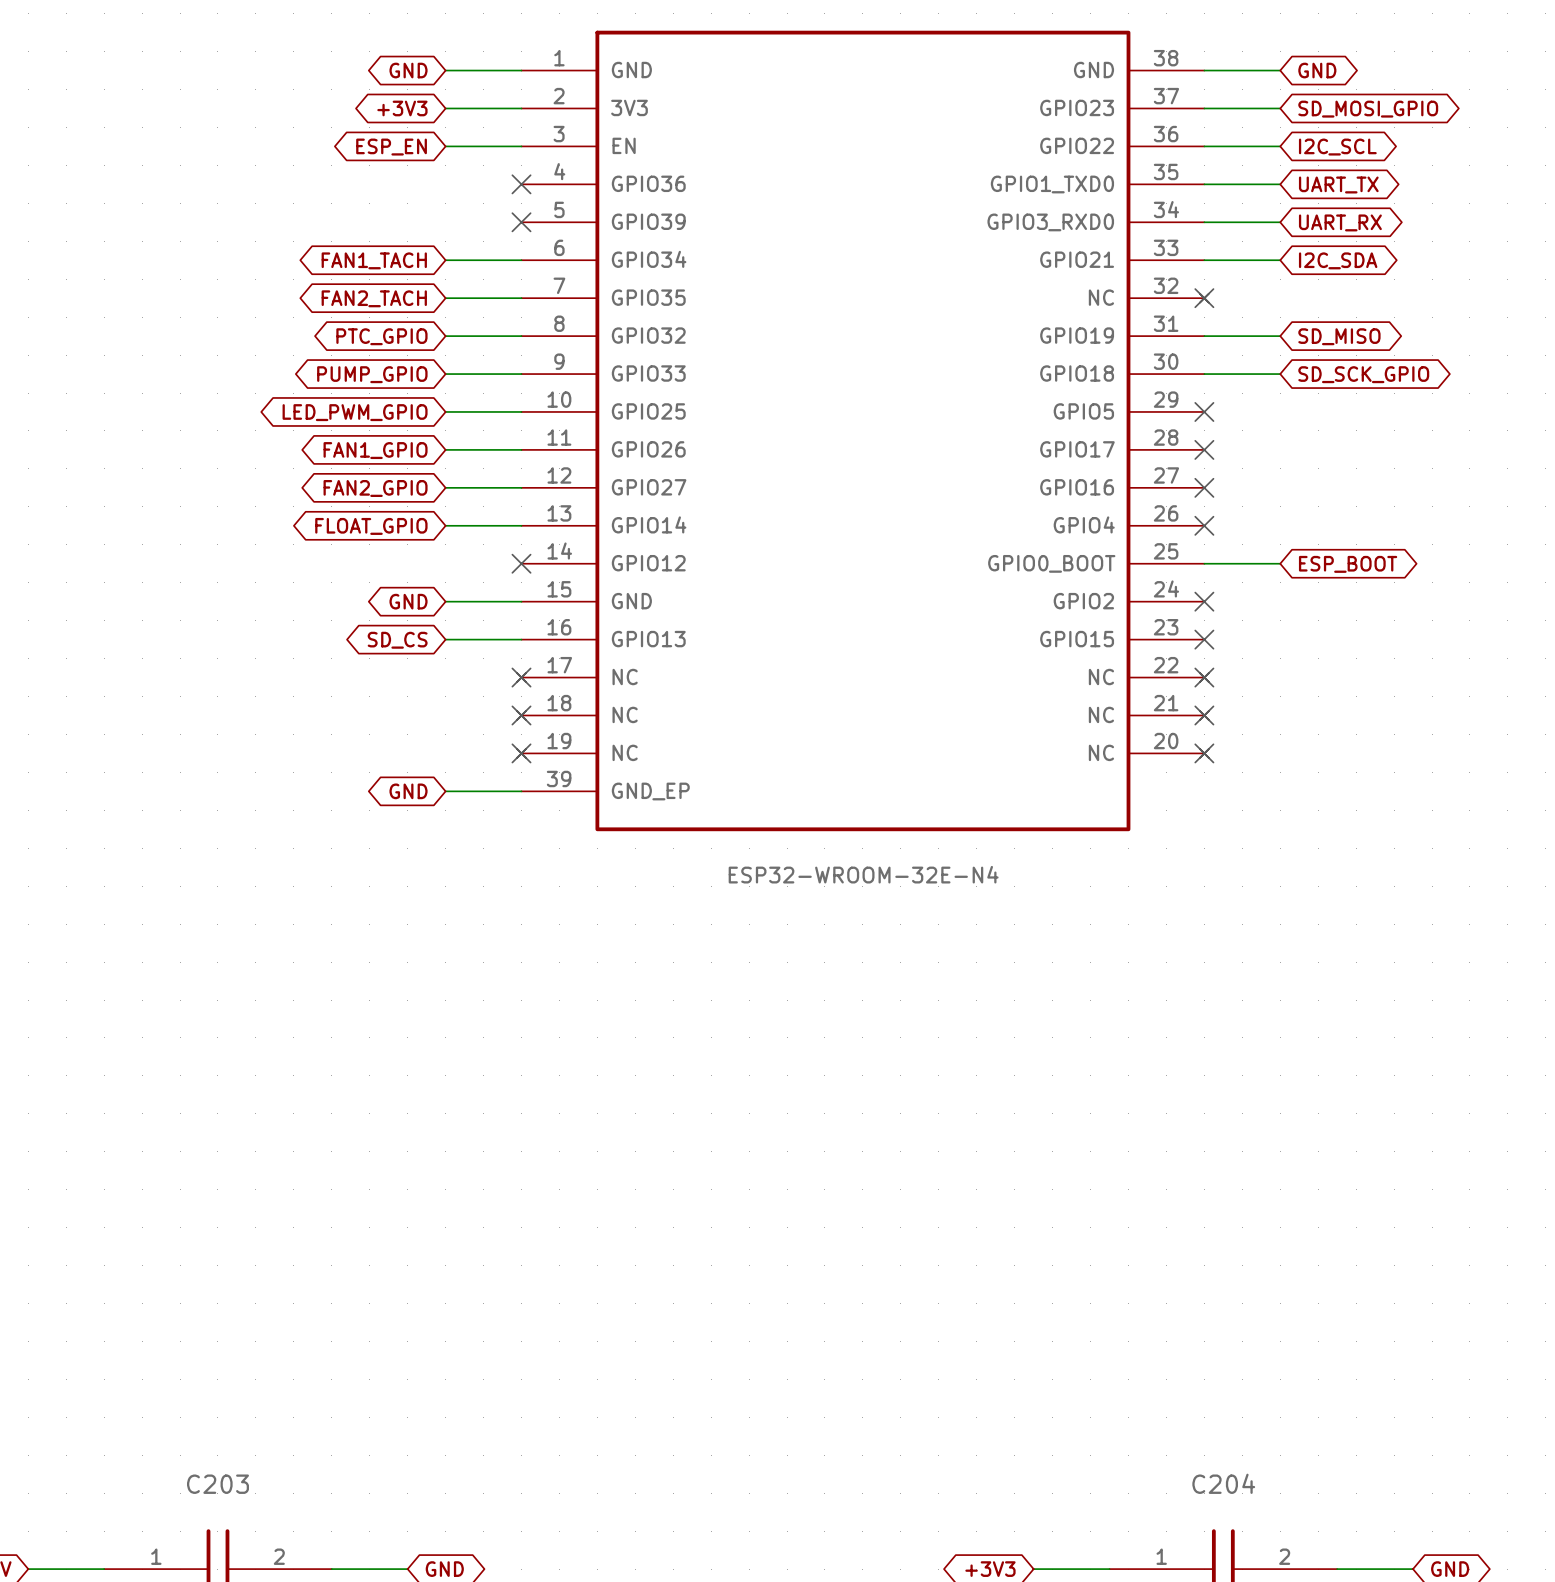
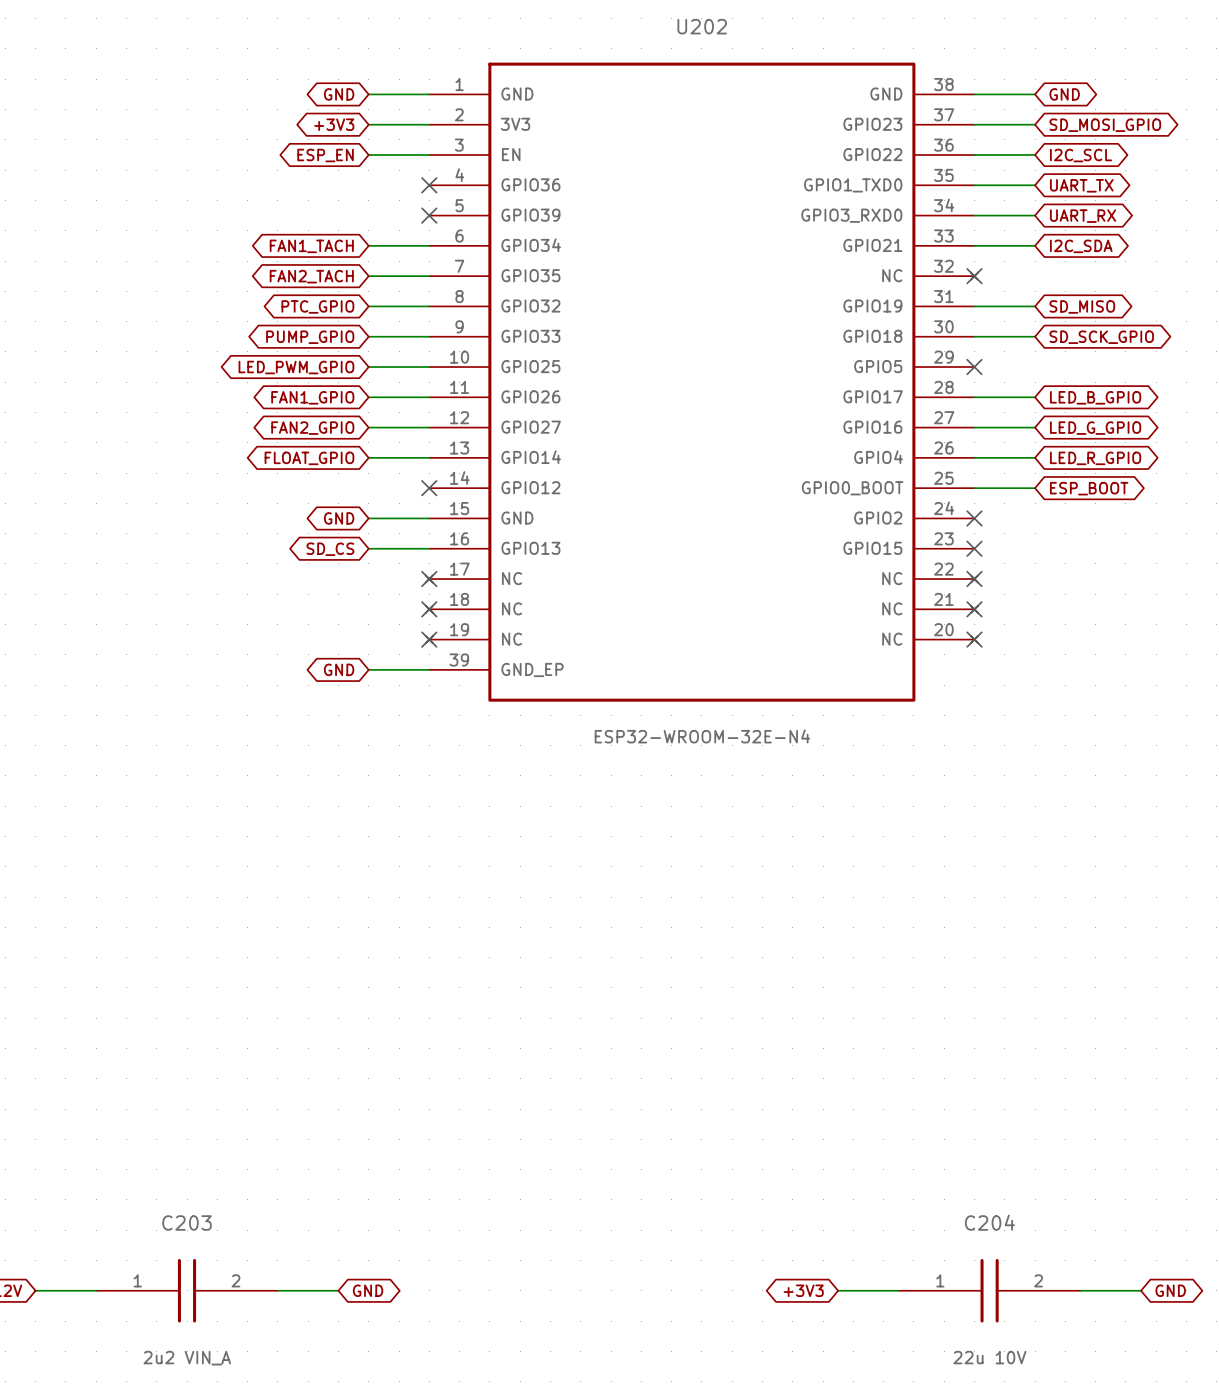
wire: none -> (974, 397) (1035, 397)
no-connect mark: (1204, 449) -> none
global label: none -> LED_B_GPIO (1095, 397)
wire: none -> (974, 427) (1035, 427)
no-connect mark: (1204, 487) -> none
global label: none -> LED_G_GPIO (1095, 428)
wire: none -> (974, 457) (1035, 457)
no-connect mark: (1204, 525) -> none
global label: none -> LED_R_GPIO (1095, 458)

